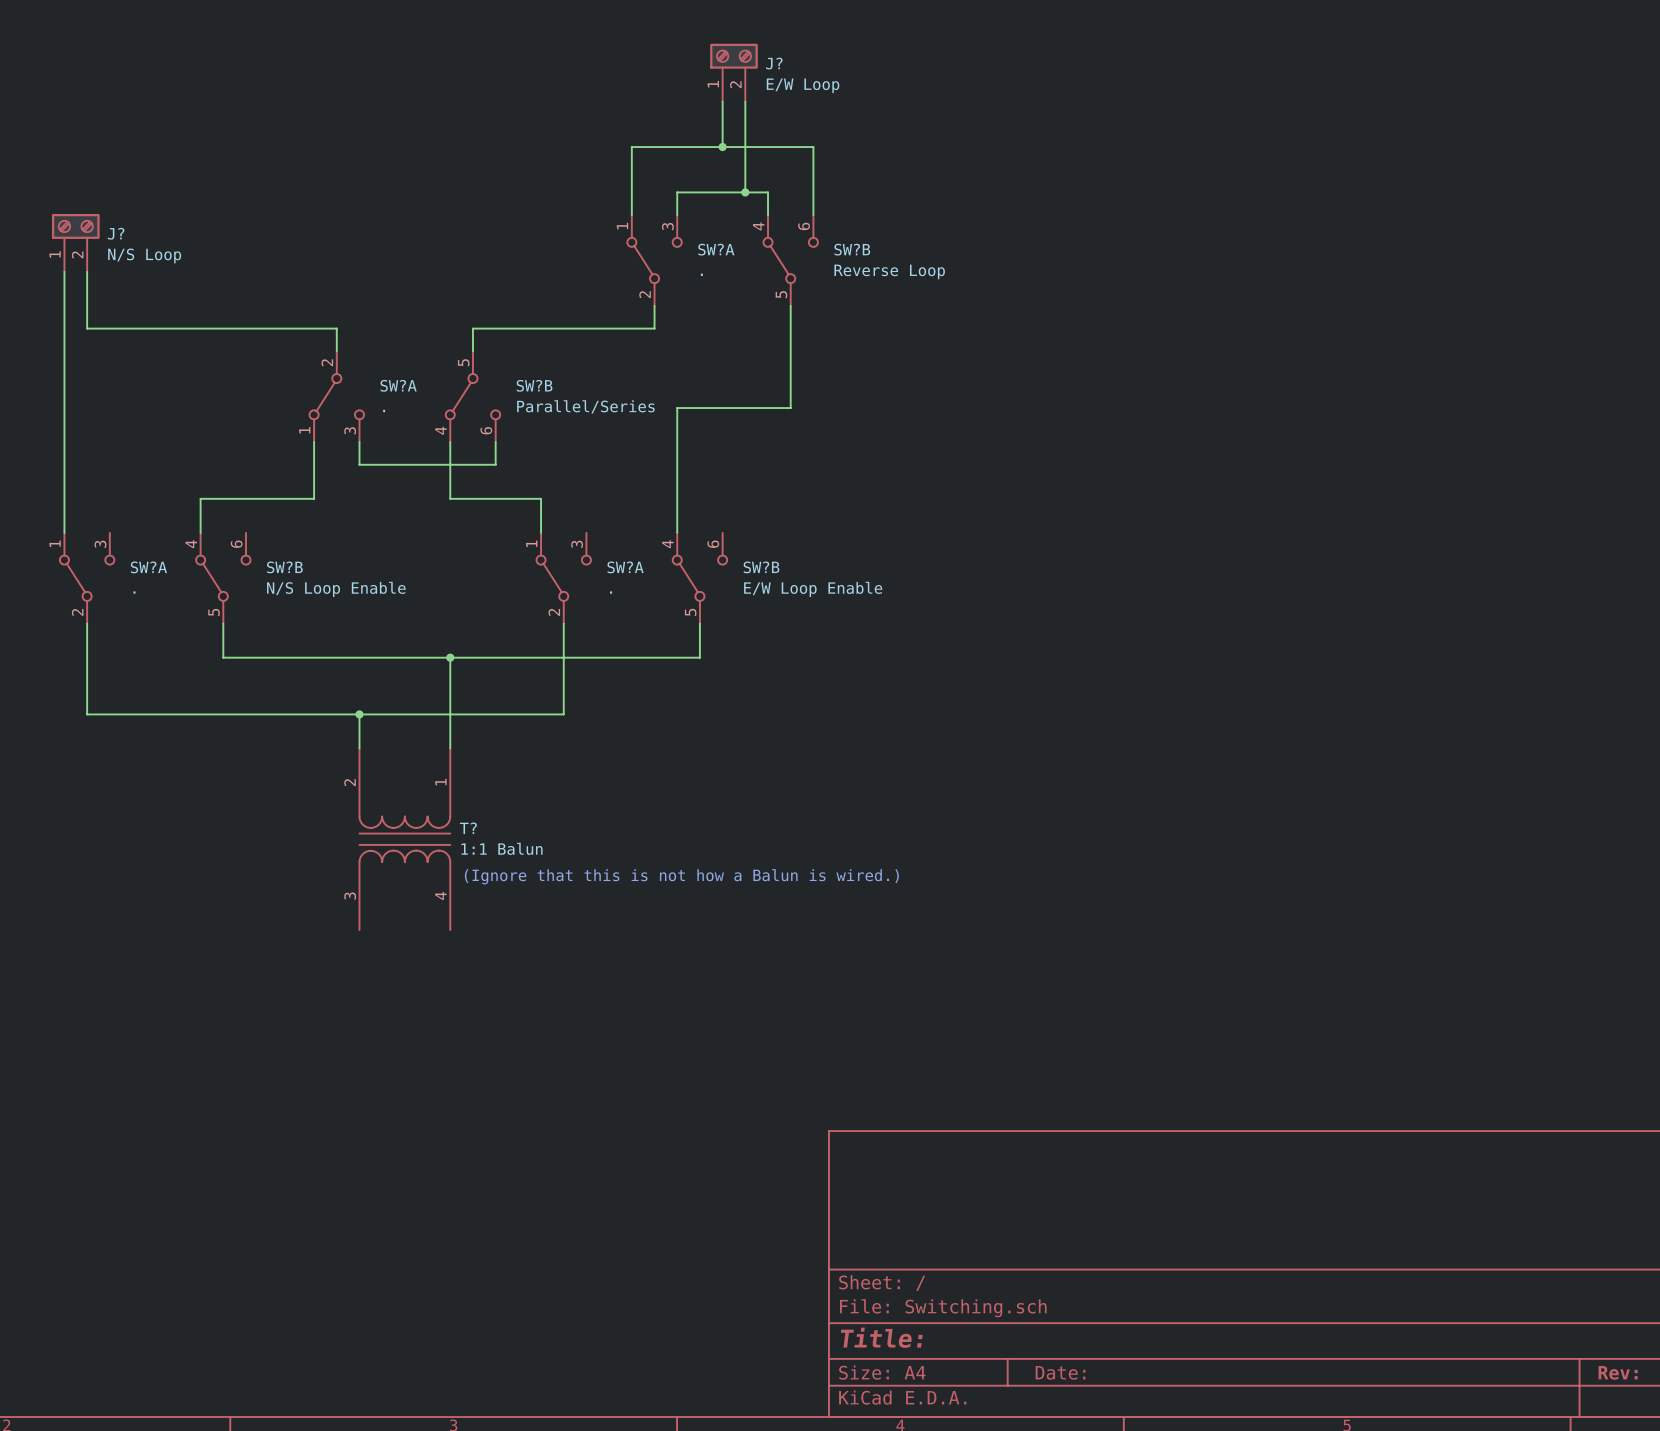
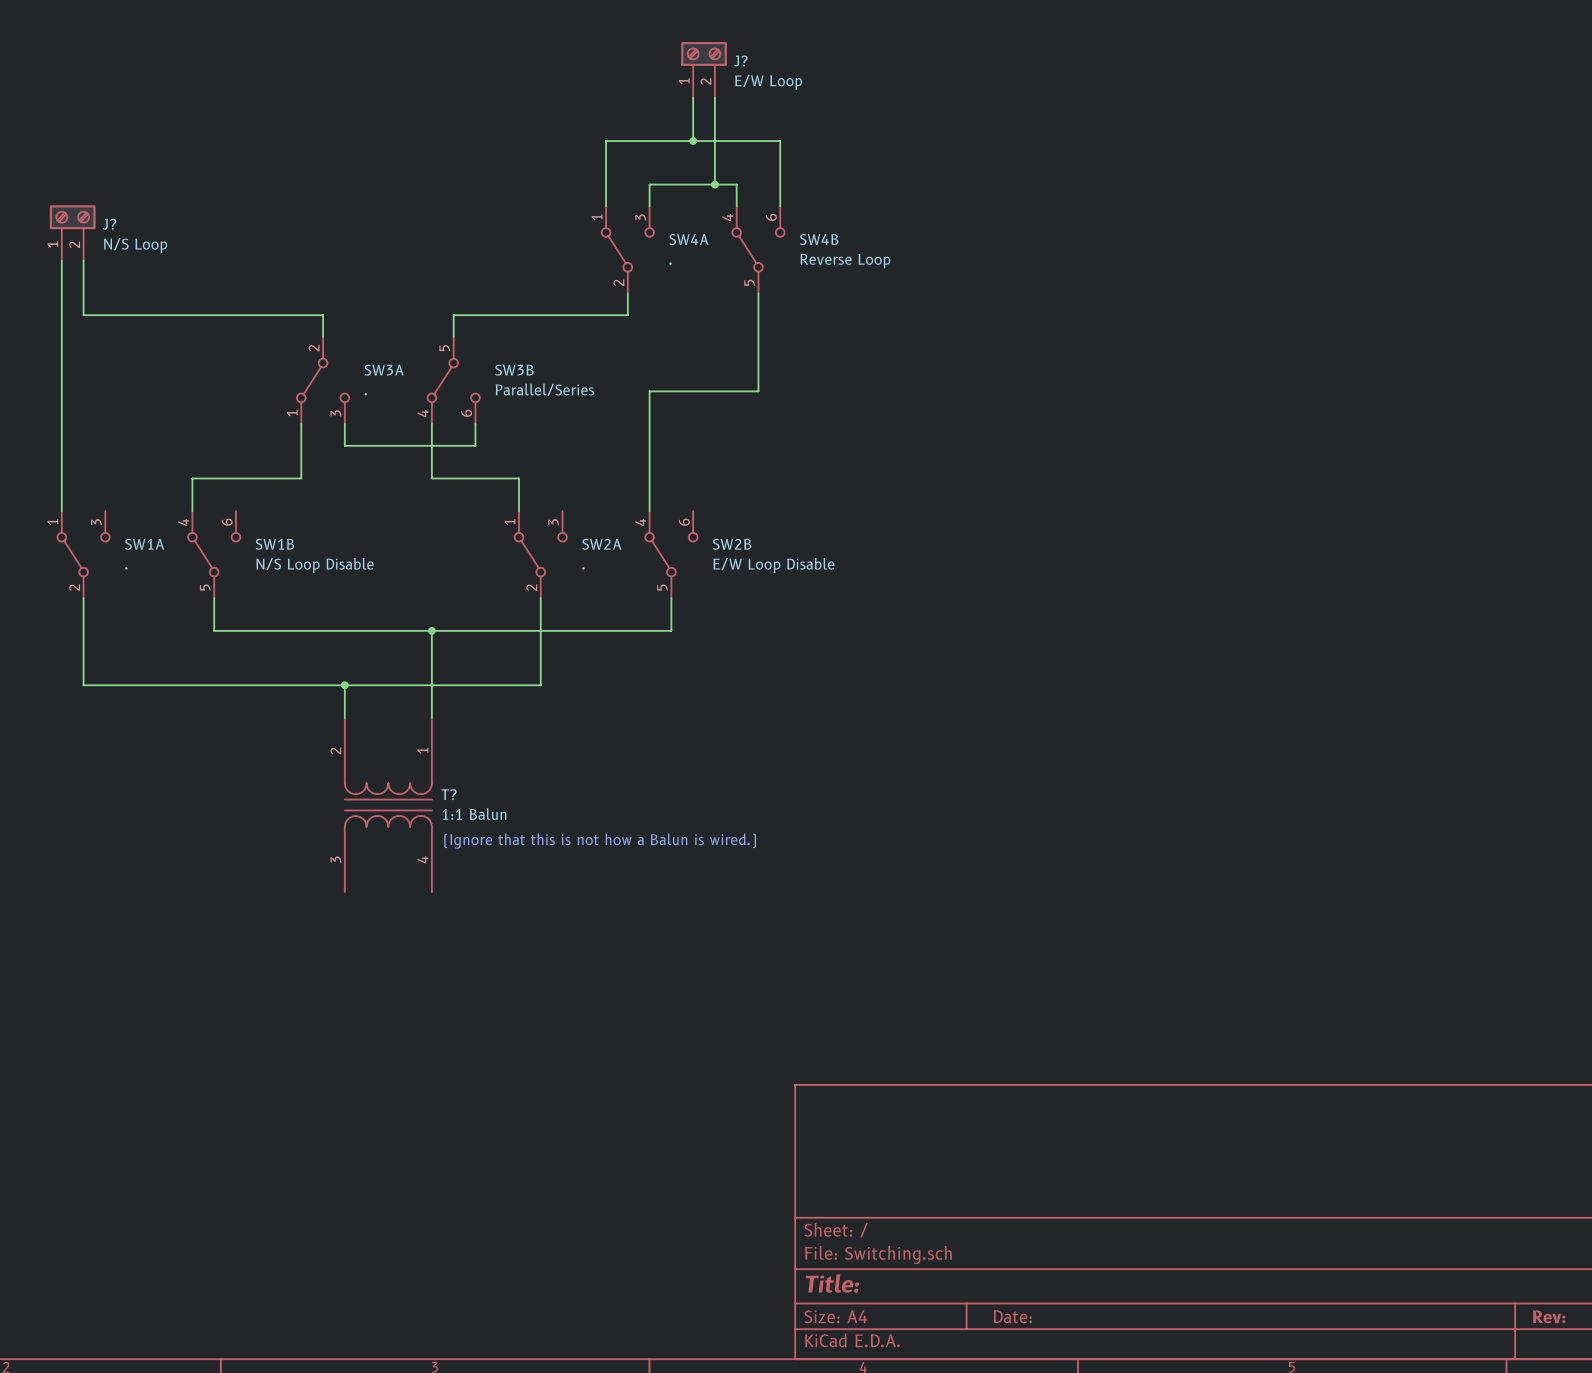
SW?A name: SW?A (716, 249) -> SW4A (688, 239)
SW?B name: SW?B (852, 249) -> SW4B (819, 239)
SW?A name: SW?A (398, 385) -> SW3A (384, 370)
SW?B name: SW?B (534, 385) -> SW3B (514, 370)
SW?A name: SW?A (148, 567) -> SW1A (144, 544)
SW?B name: SW?B (284, 567) -> SW1B (274, 544)
SW?A name: SW?A (625, 567) -> SW2A (601, 544)
SW?B name: SW?B (761, 567) -> SW2B (732, 544)
SW?B value: N/S Loop Enable (336, 589) -> N/S Loop Disable (314, 565)
SW?B value: E/W Loop Enable (813, 589) -> E/W Loop Disable (773, 565)

